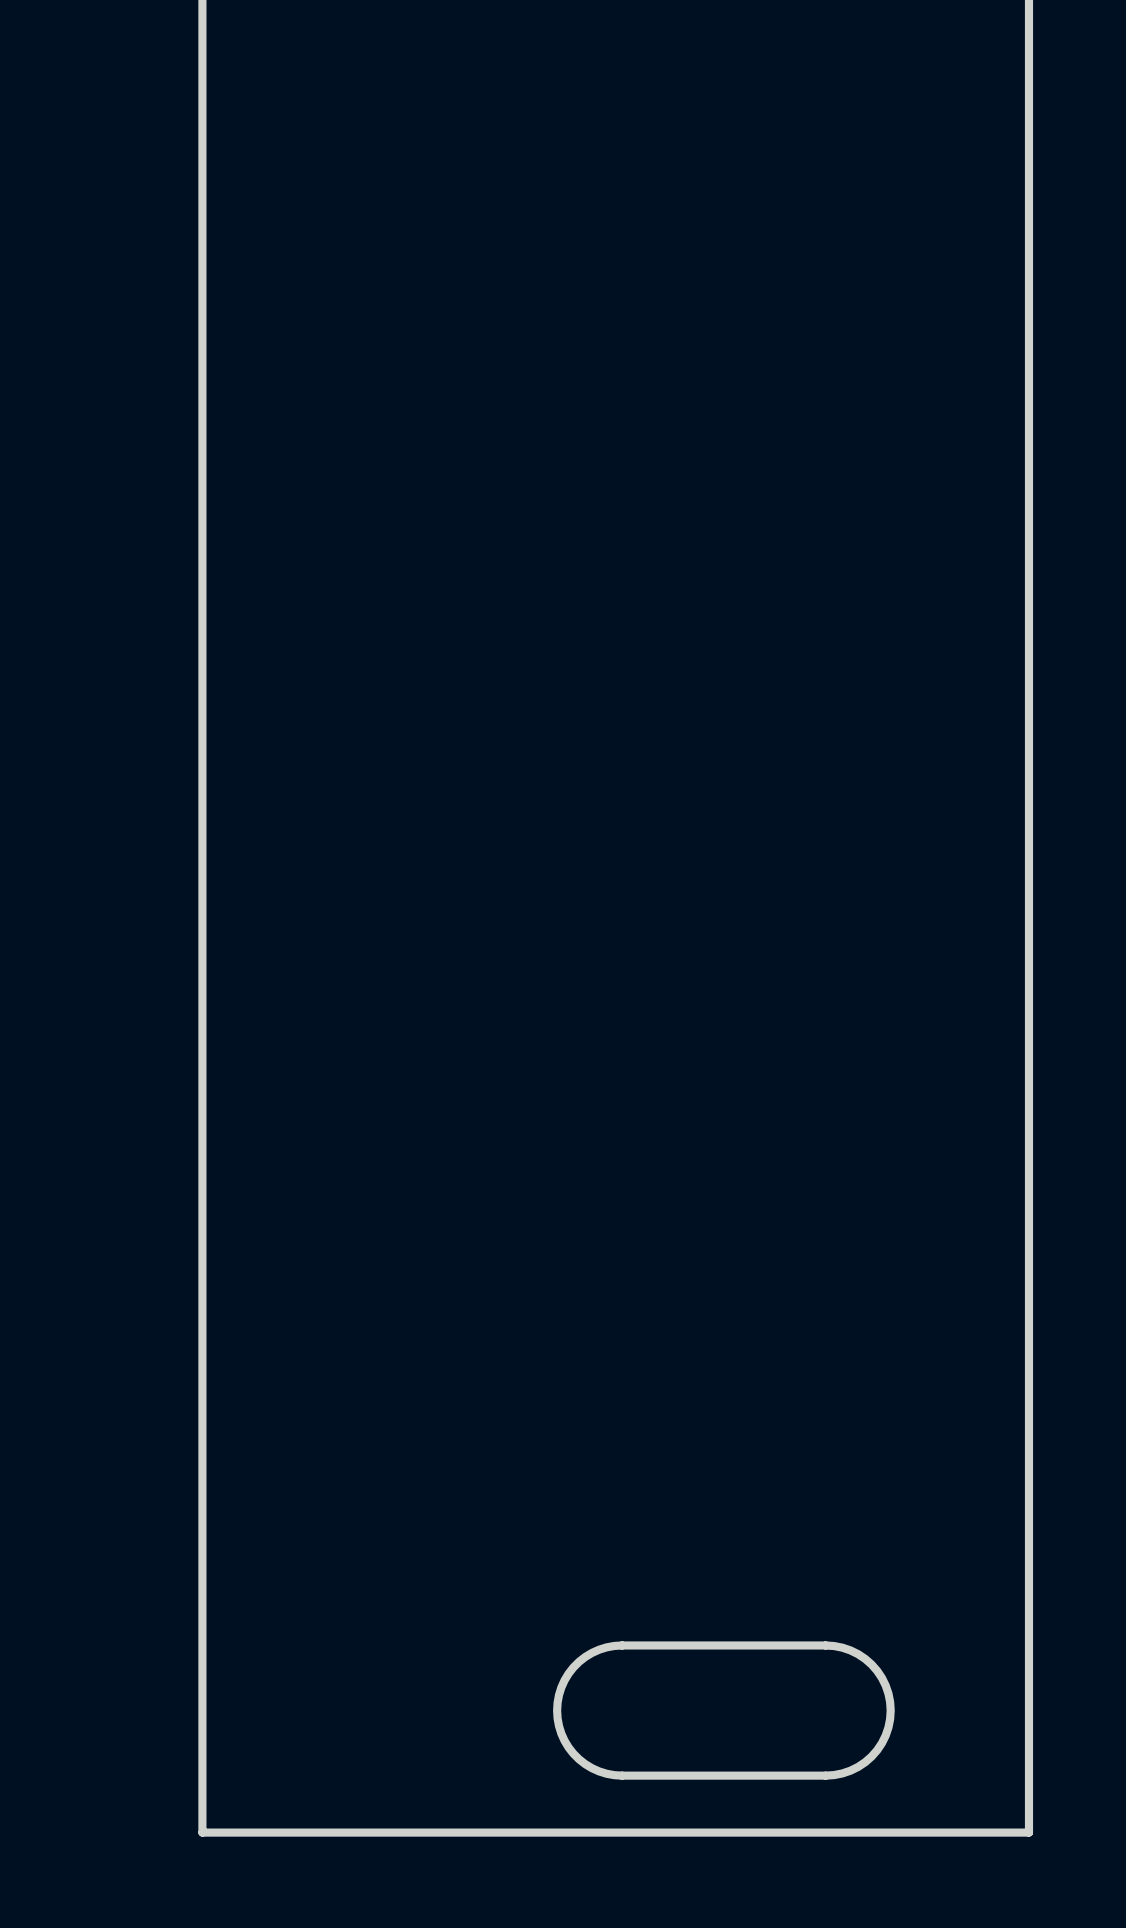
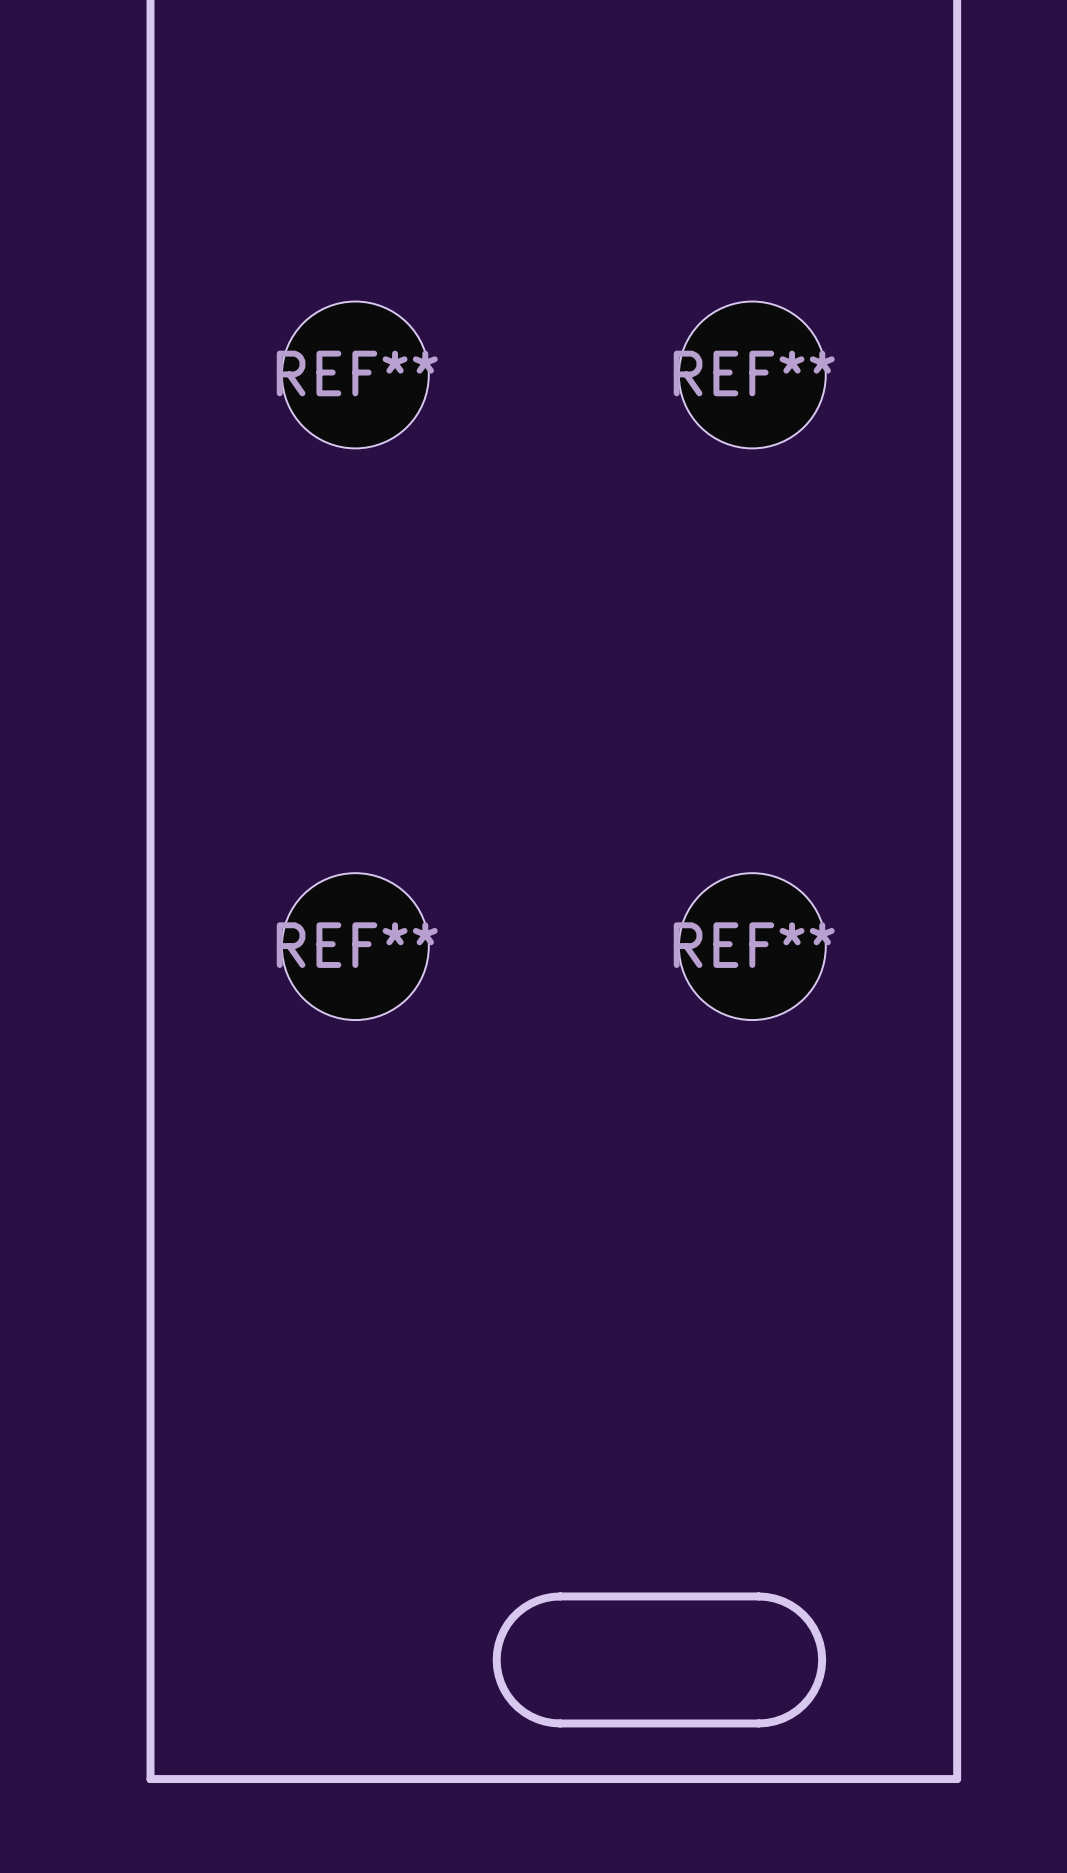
REF**: none -> (355, 374)
REF**: none -> (752, 374)
REF**: none -> (355, 946)
REF**: none -> (752, 946)

